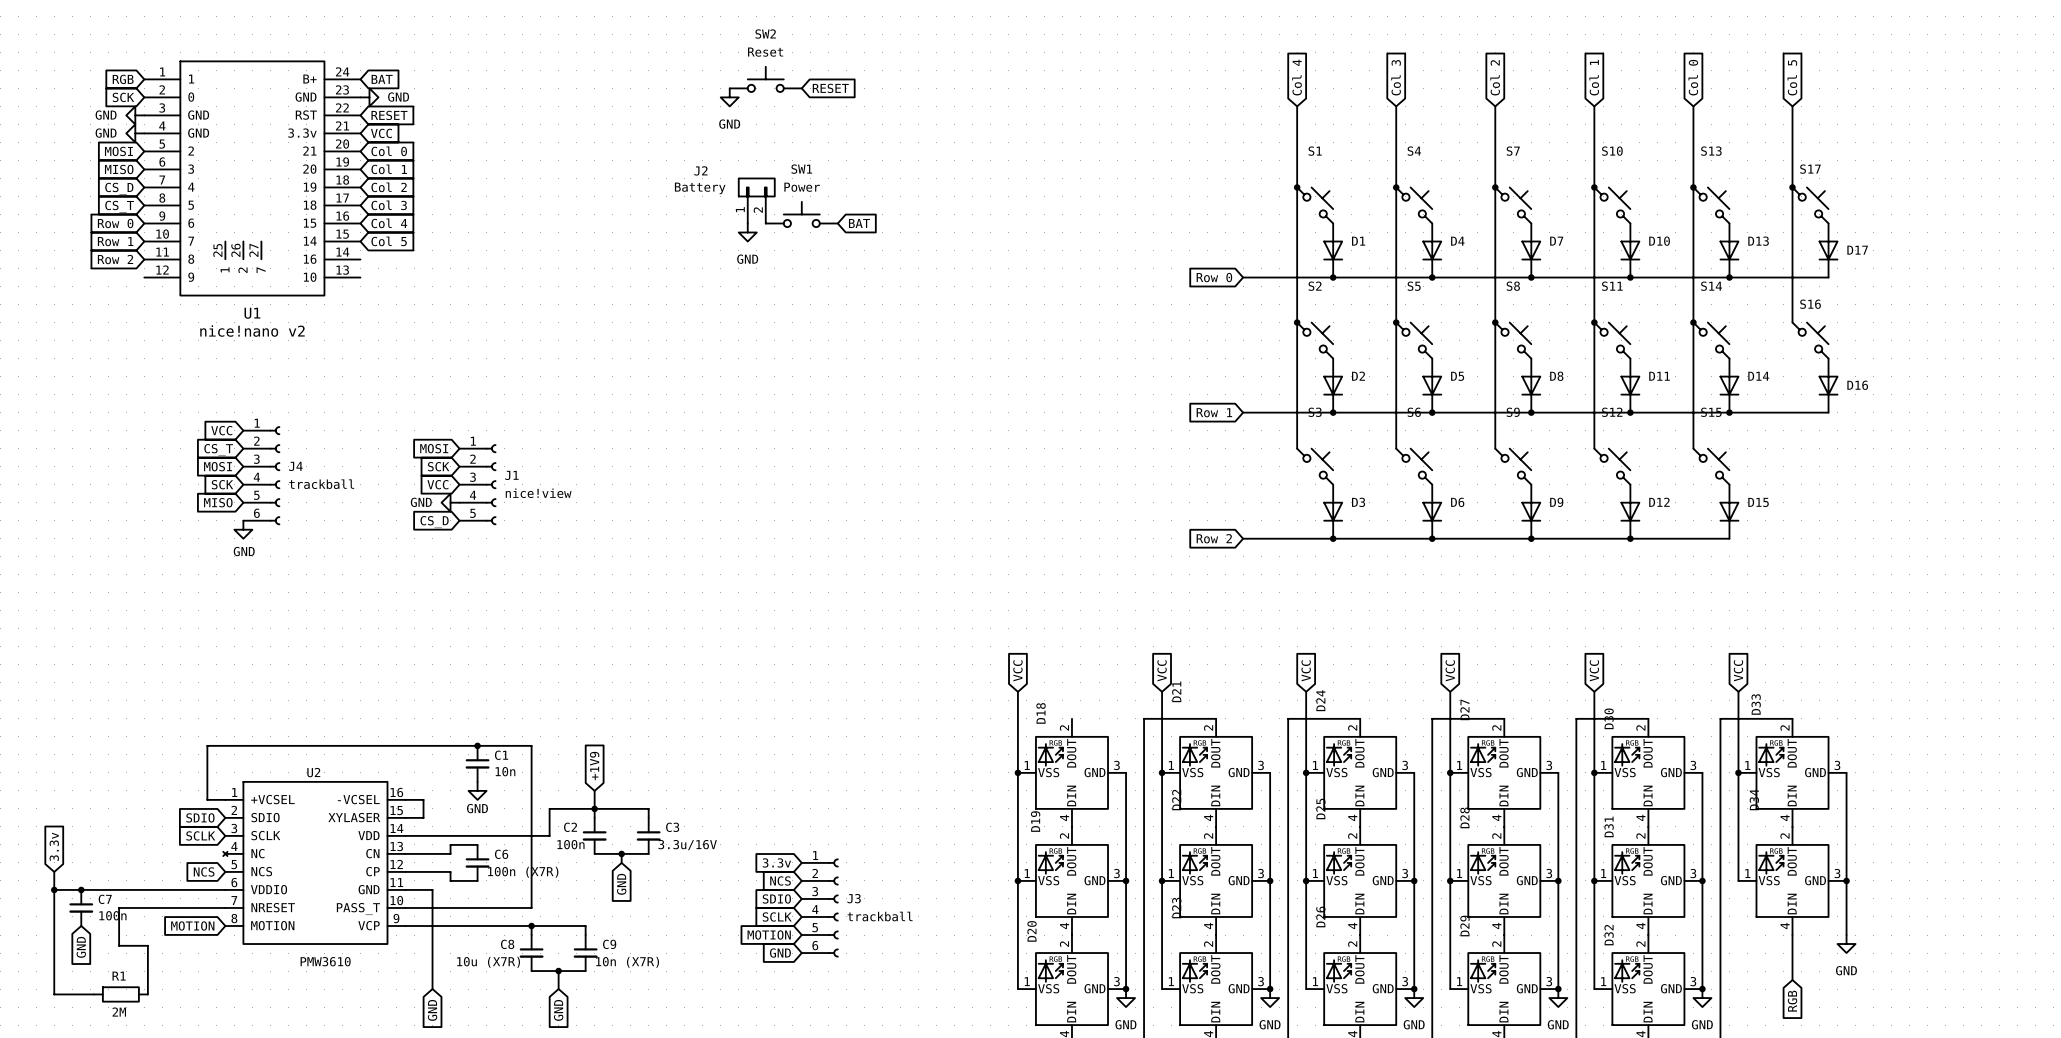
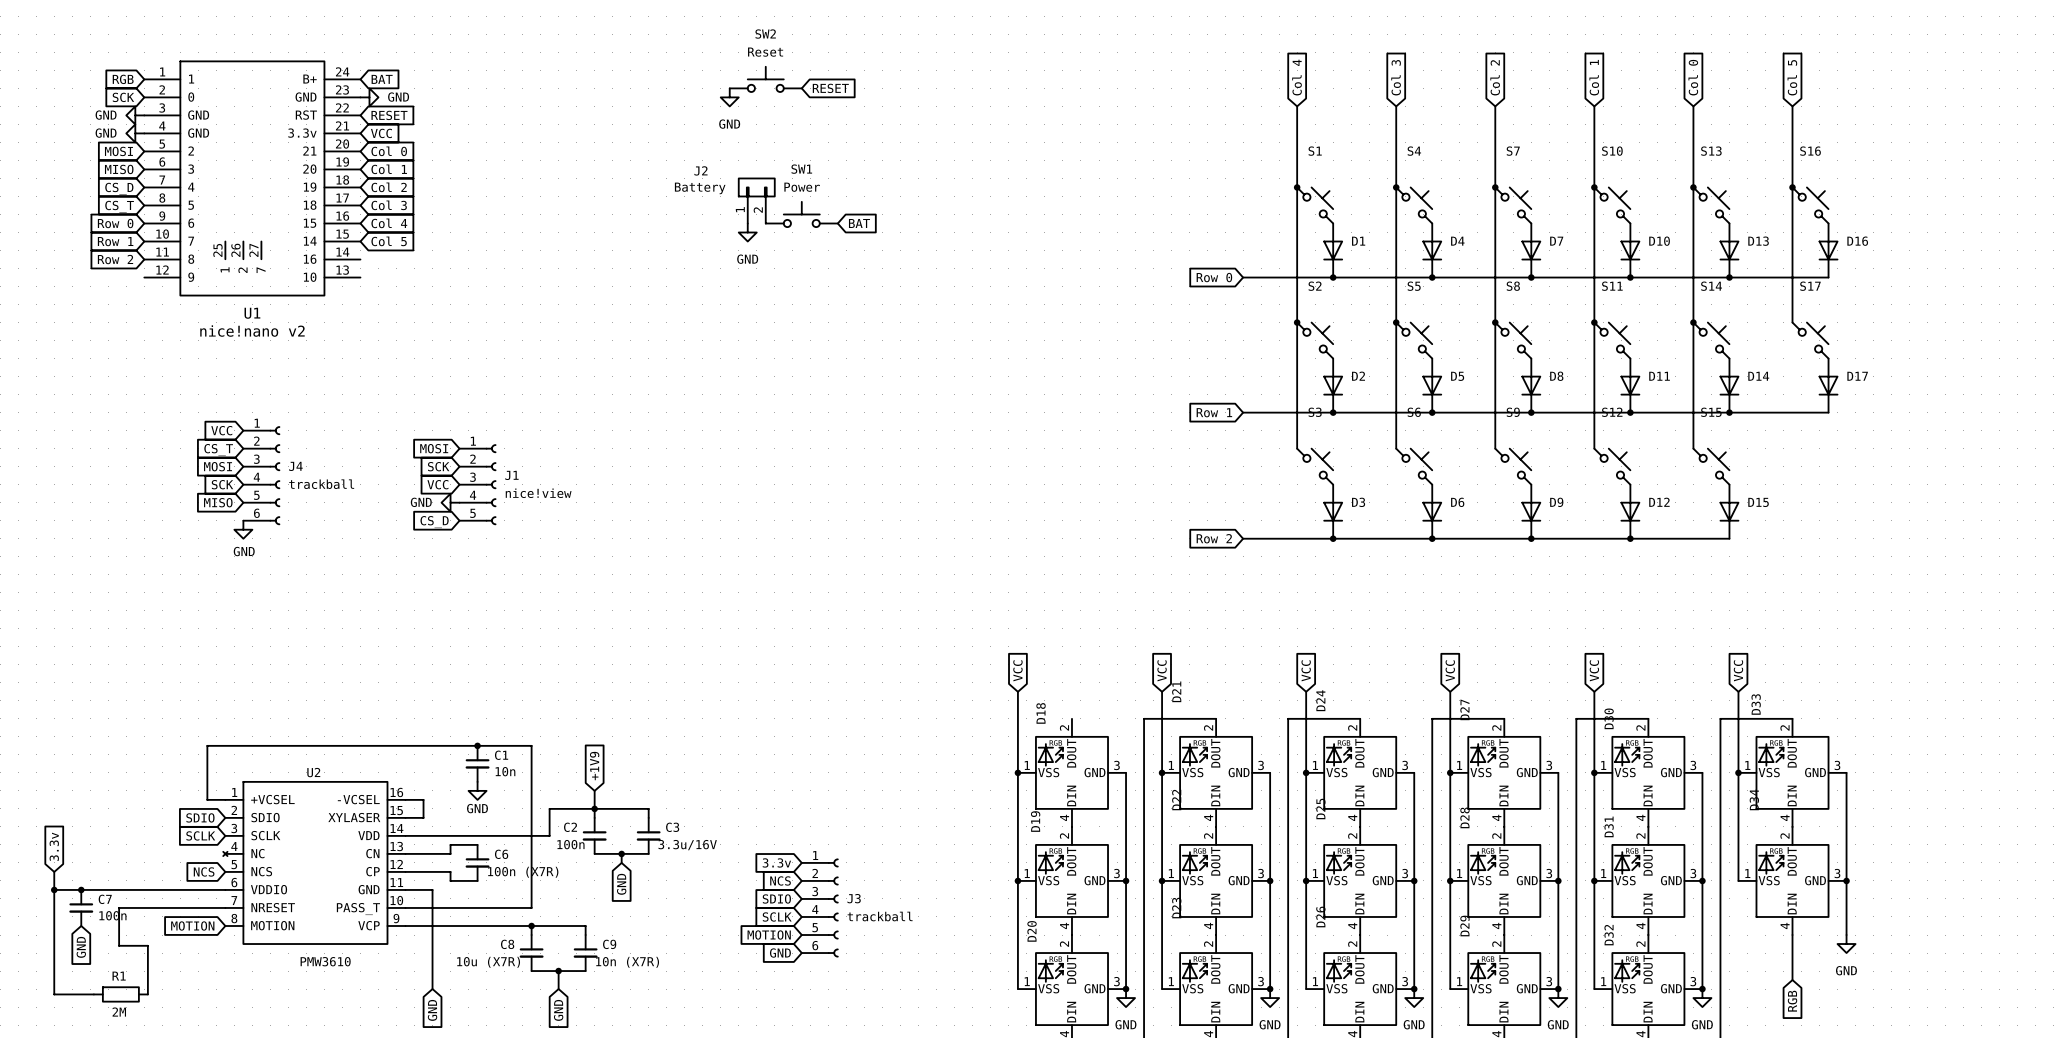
S17 name: S17 (1810, 169) -> S16 (1810, 151)
D17 name: D17 (1857, 250) -> D16 (1857, 241)
S16 name: S16 (1810, 304) -> S17 (1810, 286)
D16 name: D16 (1857, 385) -> D17 (1857, 376)

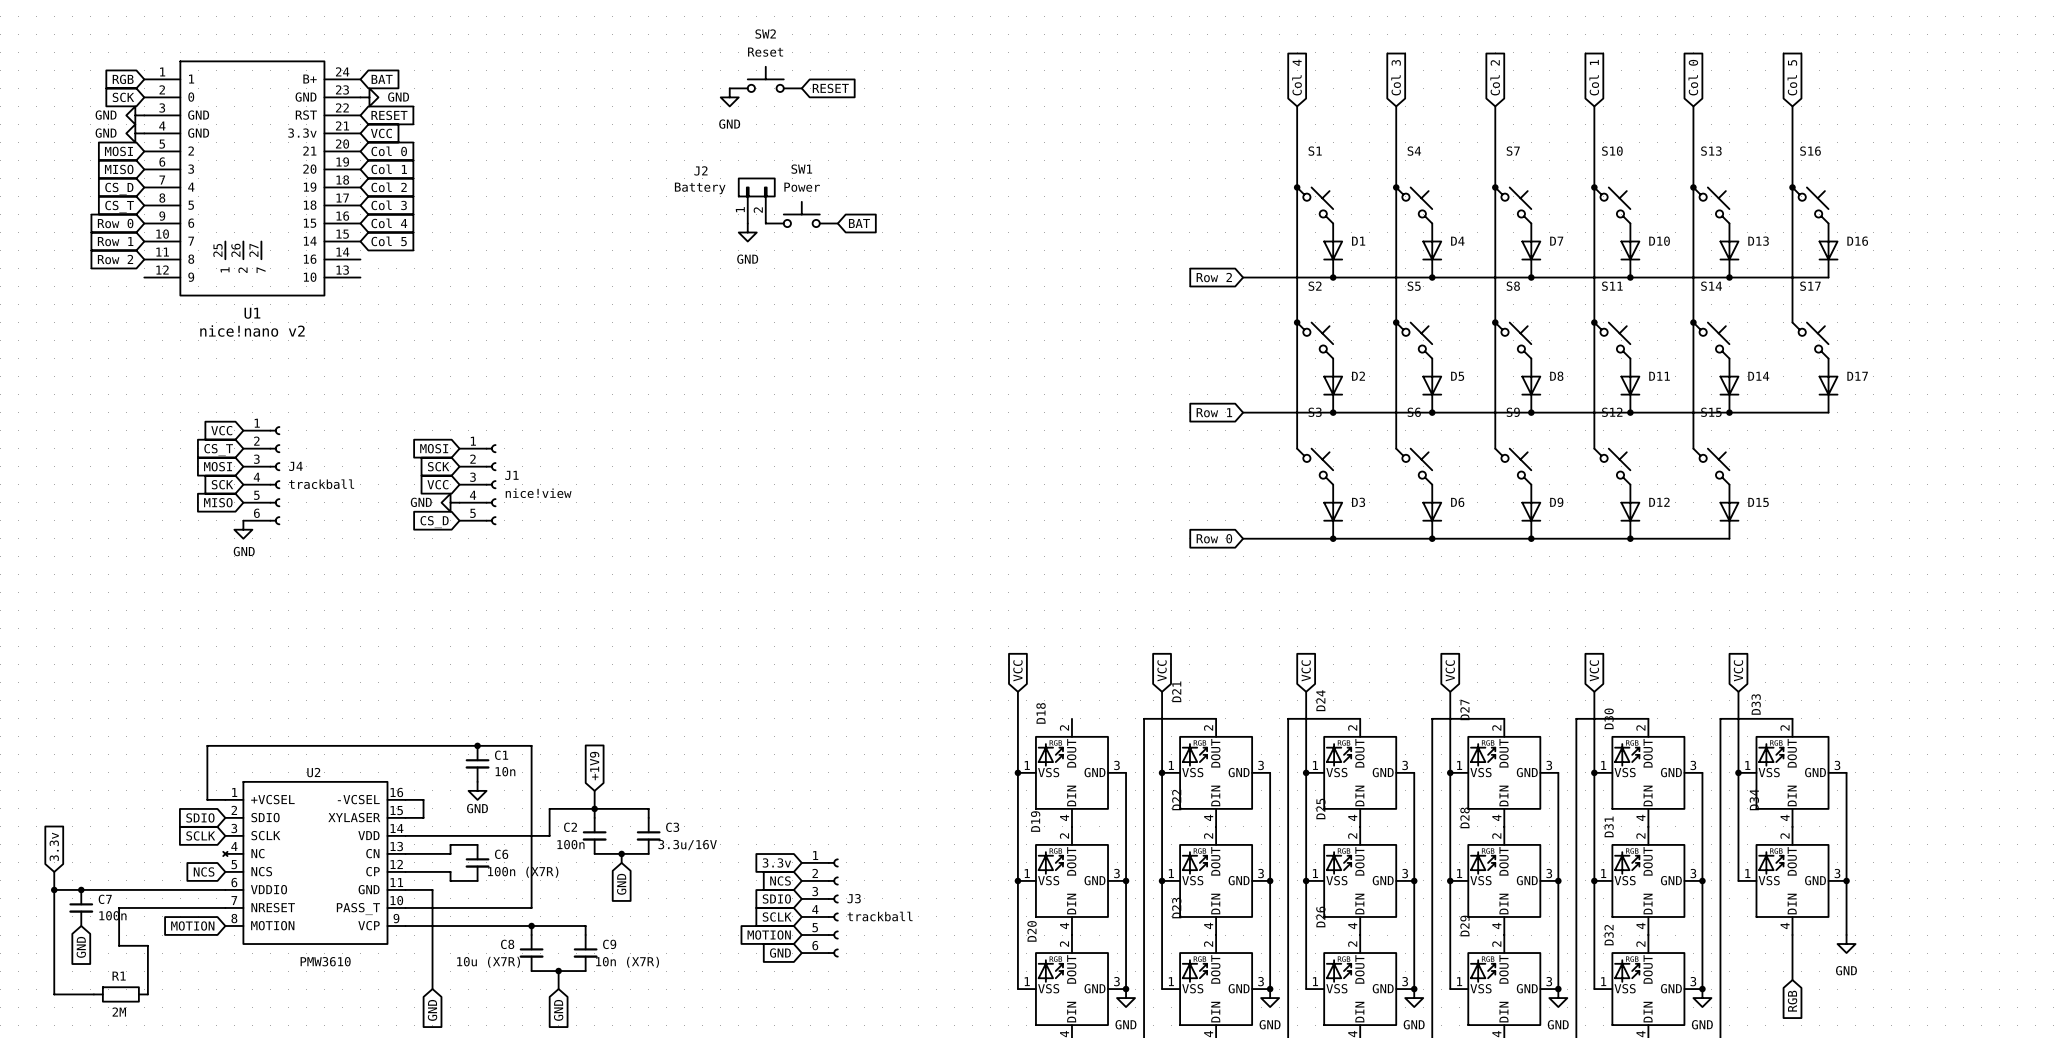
global label: Row 0 (1214, 277) -> Row 2 (1214, 277)
global label: Row 2 (1214, 538) -> Row 0 (1214, 538)

